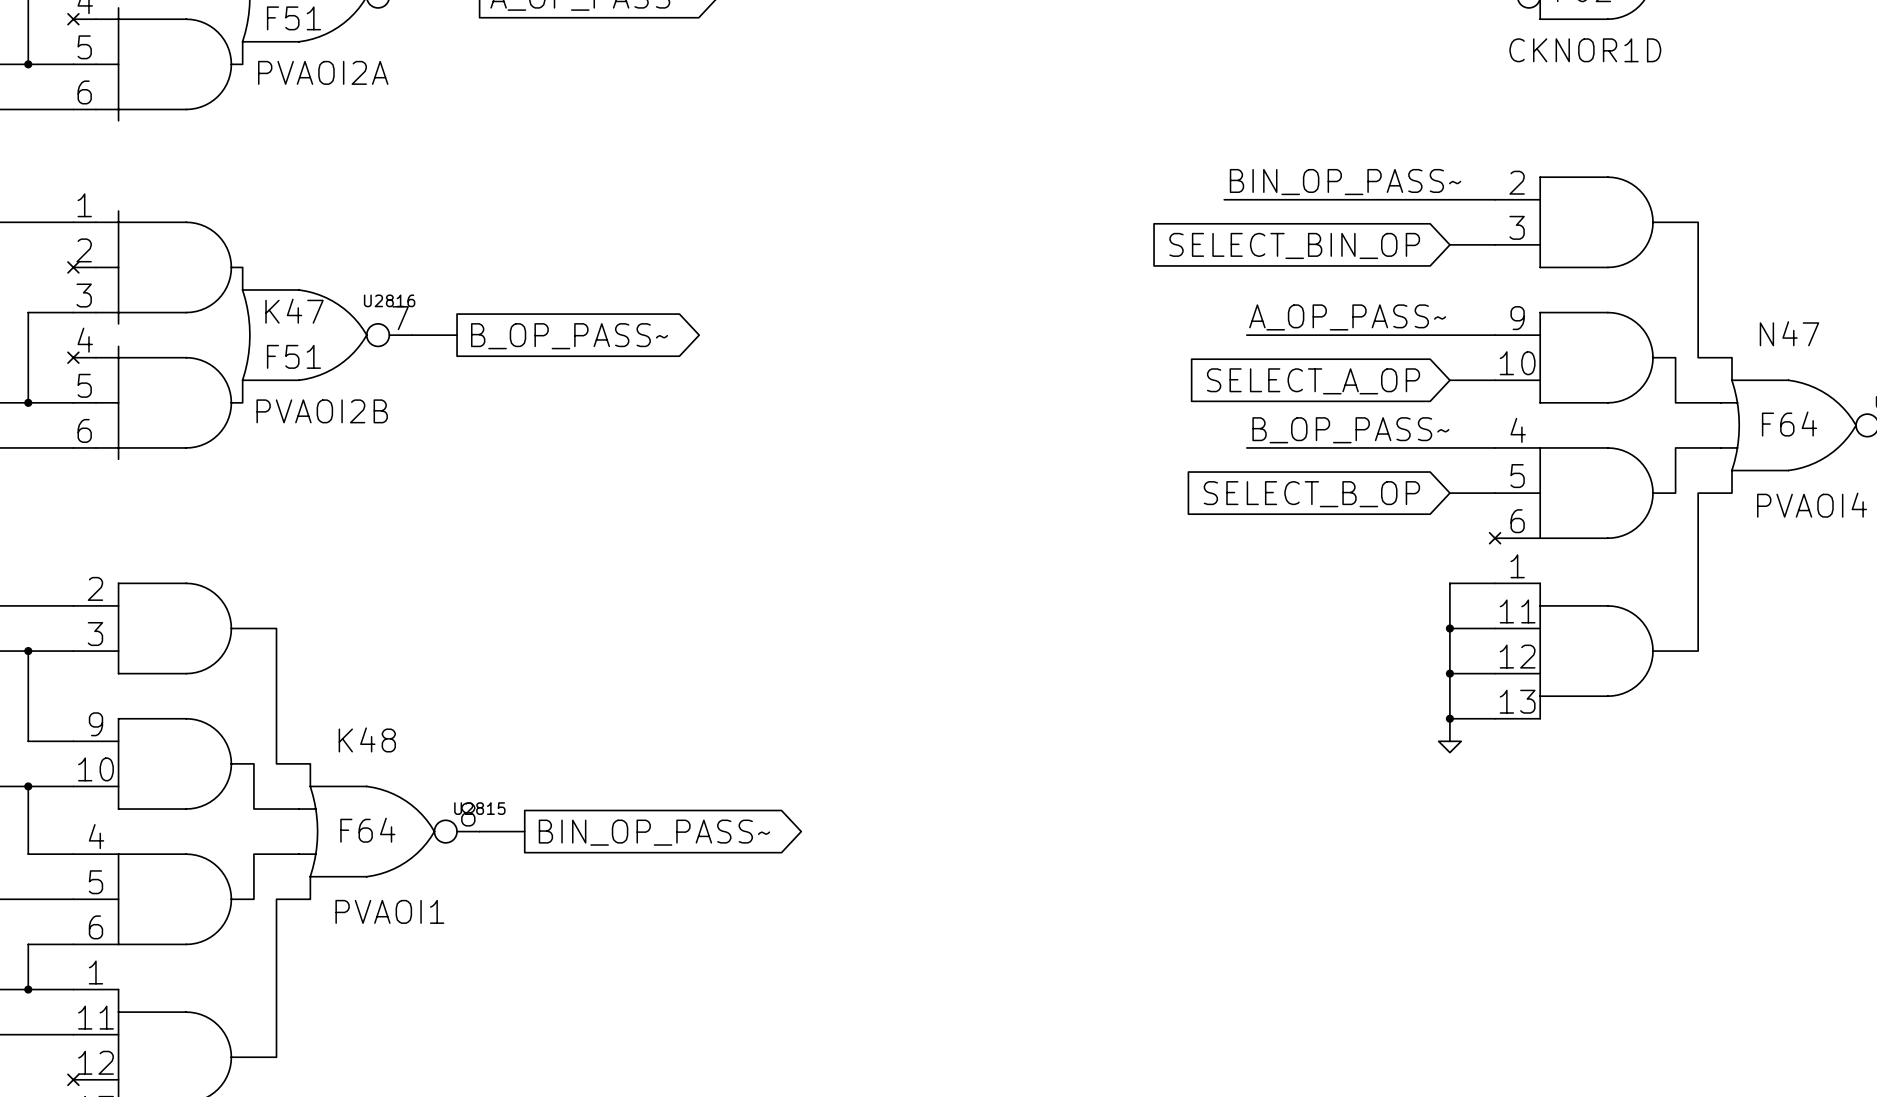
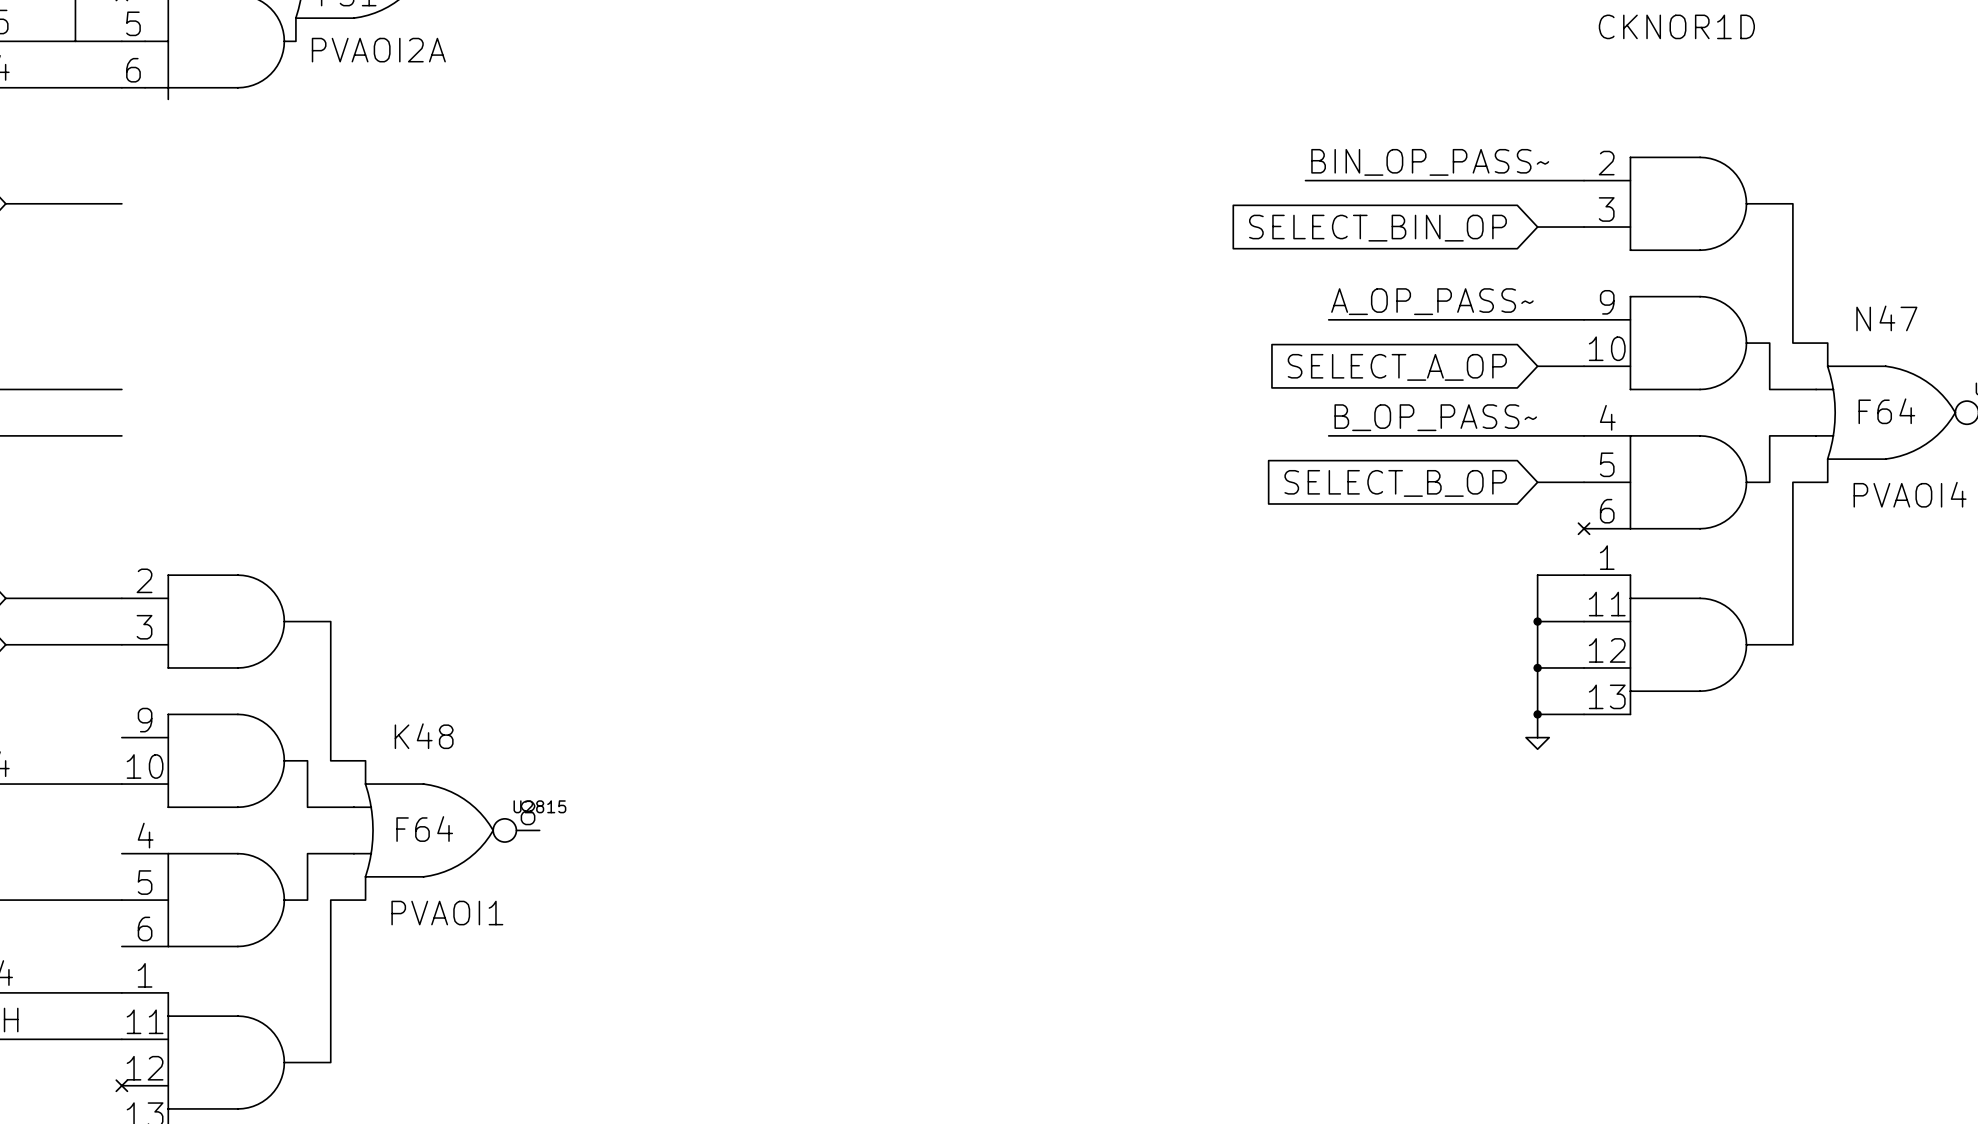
junction: (28, 64) -> none
no-connect mark: (73, 267) -> none
wire: (73, 312) (28, 312) (28, 402) -> none
U2816: F51 (242, 335) -> none
wire: (411, 335) (457, 335) -> none
global label: B_OP_PASS~ (569, 336) -> none
no-connect mark: (73, 357) -> none
junction: (28, 402) -> none
wire: (28, 651) (28, 741) (73, 741) -> none
junction: (28, 651) -> none
wire: (28, 786) (28, 854) (73, 854) -> none
junction: (28, 786) -> none
wire: (479, 831) (524, 831) -> none
global label: BIN_OP_PASS~ (654, 832) -> none
wire: (73, 944) (28, 944) (28, 989) -> none
junction: (28, 989) -> none

